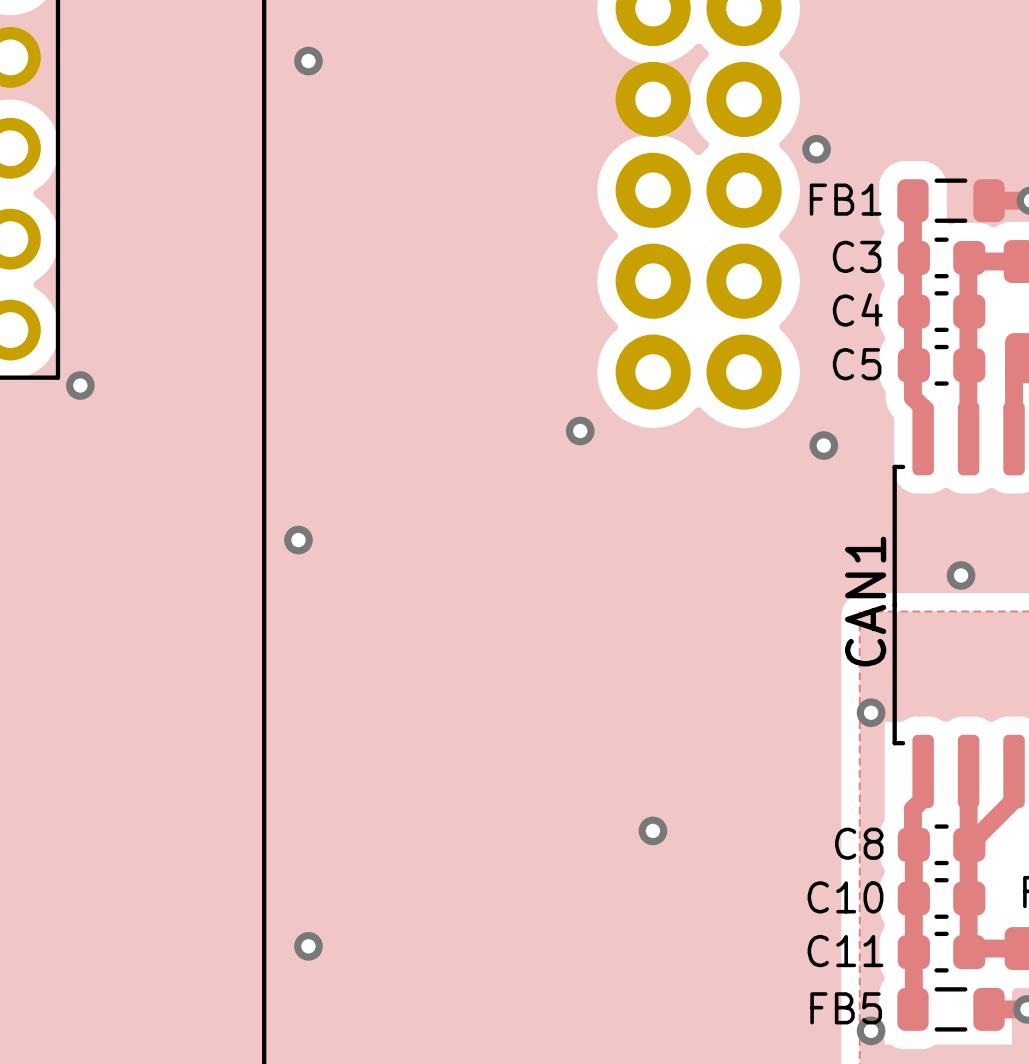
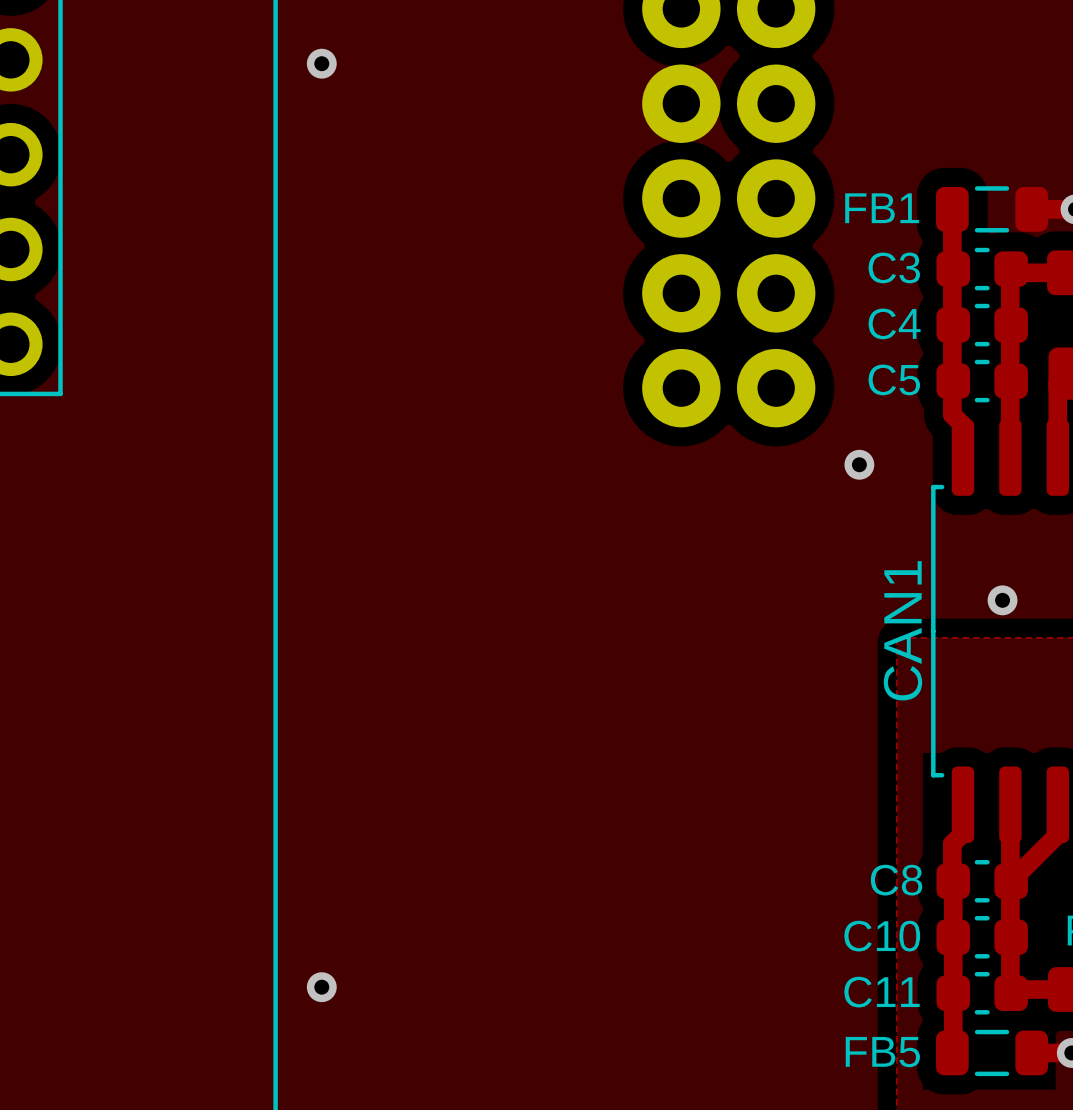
via: (816, 149) -> none
via: (80, 385) -> none
via: (580, 430) -> none
via: (298, 540) -> none
via: (871, 712) -> none
via: (652, 830) -> none
via: (871, 1030) -> none

